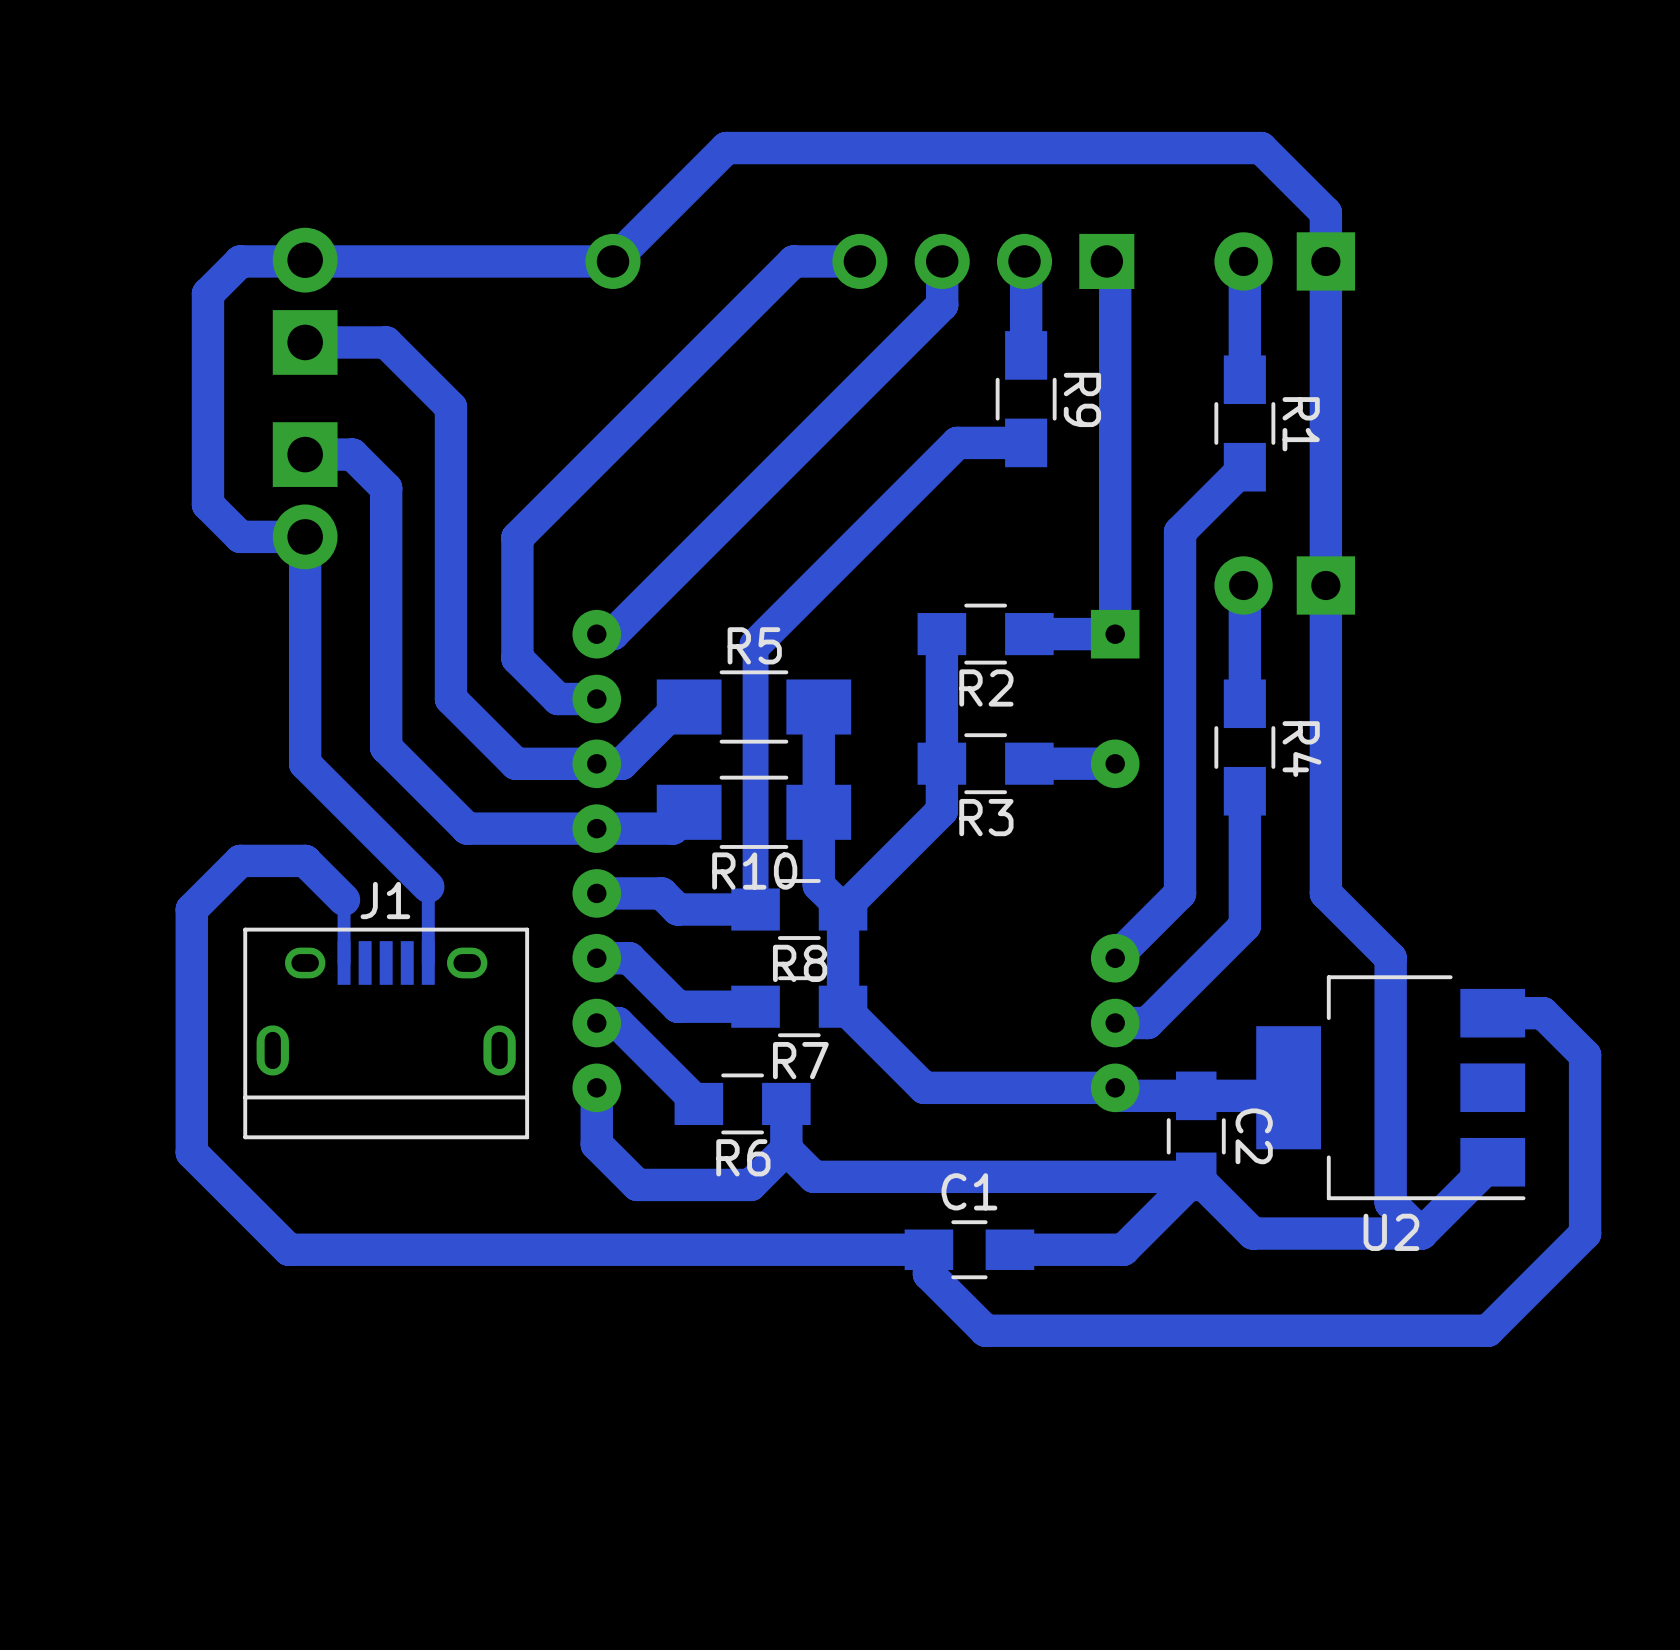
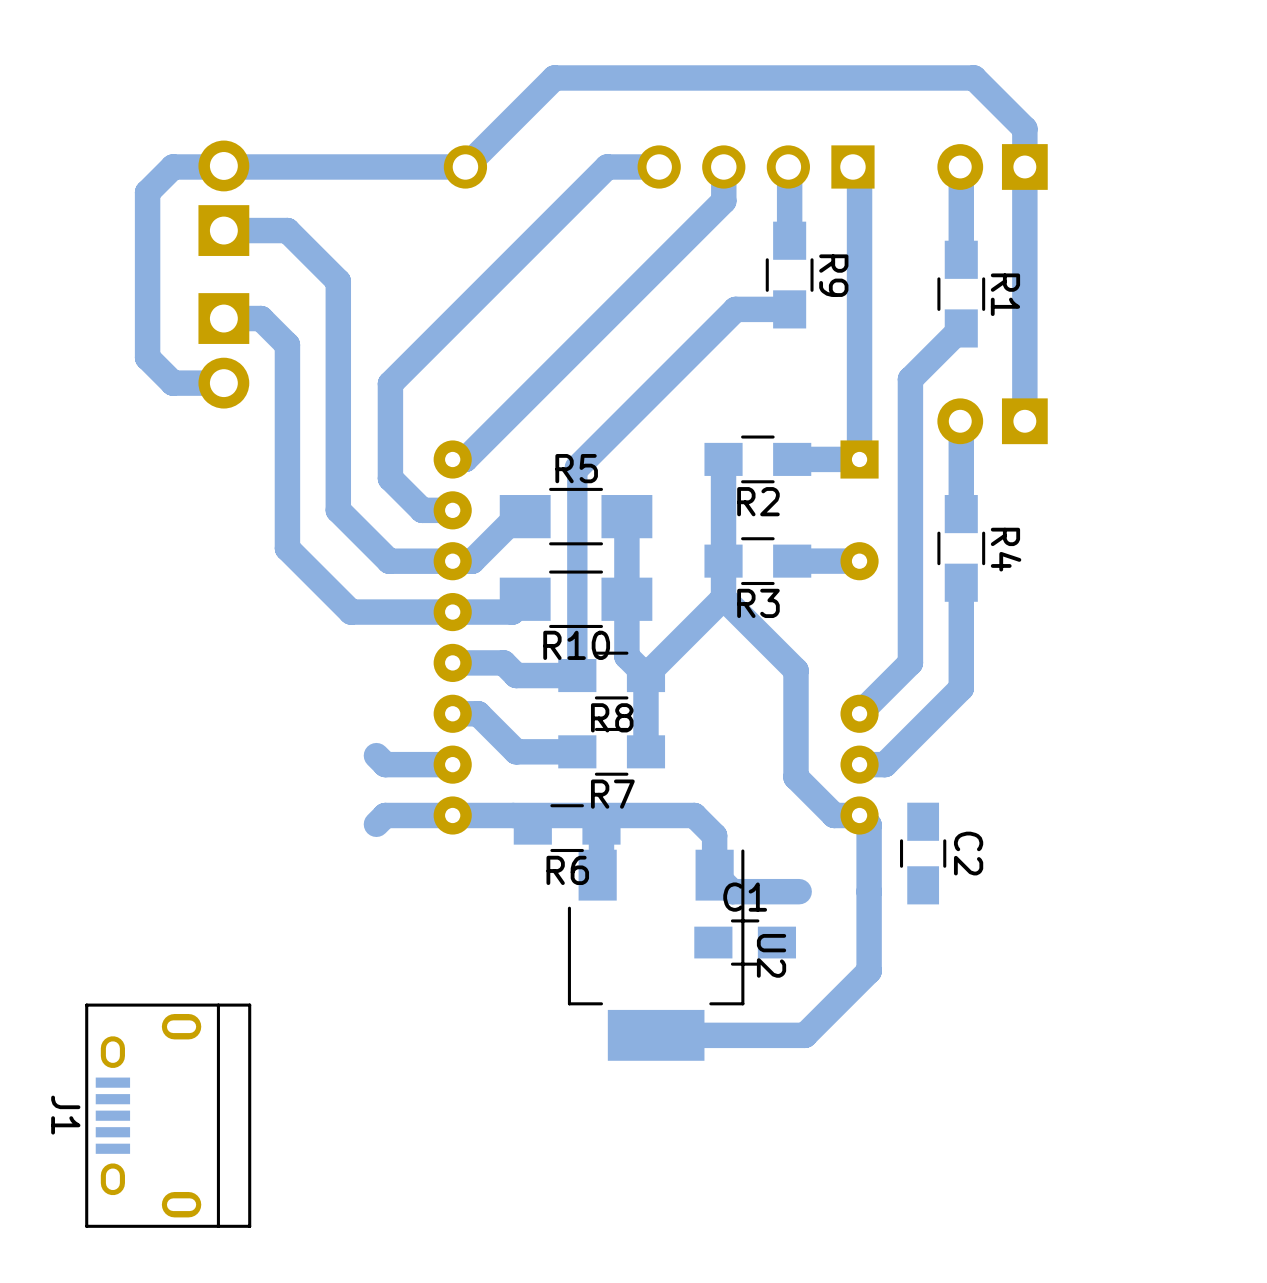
bottom track: (305, 536) (305, 763) (428, 886) (428, 962) -> none
bottom track: (1325, 585) (1325, 893) (1390, 958) (1390, 1202) (1421, 1233) -> none
bottom track: (344, 962) (344, 899) (305, 860) (240, 860) (191, 909) (191, 1152) (288, 1249) (928, 1249) (928, 1274) (985, 1330) (1487, 1330) (1585, 1233) (1585, 1055) (1542, 1013) (1492, 1013) -> none
U2 footprint: [1256, 975, 1526, 1201] -> [567, 849, 745, 1061]
bottom track: (843, 1006) (924, 1087) (1082, 1087) -> (723, 597) (796, 670) (796, 777) (834, 815)
bottom track: (596, 1023) (617, 1023) (698, 1103) -> (452, 764) (385, 764) (376, 755)
J1 rotation: 0° (386, 1033) -> 90° counterclockwise (168, 1115)
J1 position: (386, 1033) -> (168, 1115)
bottom track: (596, 1087) (596, 1144) (637, 1184) (750, 1184) (786, 1149) (813, 1176) (1196, 1176) -> none
bottom track: (1288, 1087) (1280, 1095) (1123, 1095) -> (656, 1035) (804, 1035) (869, 971) (869, 825) (865, 821)
bottom track: none -> (376, 824) (385, 815) (694, 815) (714, 835) (714, 873) (732, 891) (799, 891)
bottom track: (1492, 1162) (1421, 1233) -> none
bottom track: (1196, 1176) (1123, 1249) (1009, 1249) -> none
bottom track: (1196, 1176) (1252, 1233) (1421, 1233) -> none
U2 name position: U2 (1391, 1232) -> U2 (771, 955)

